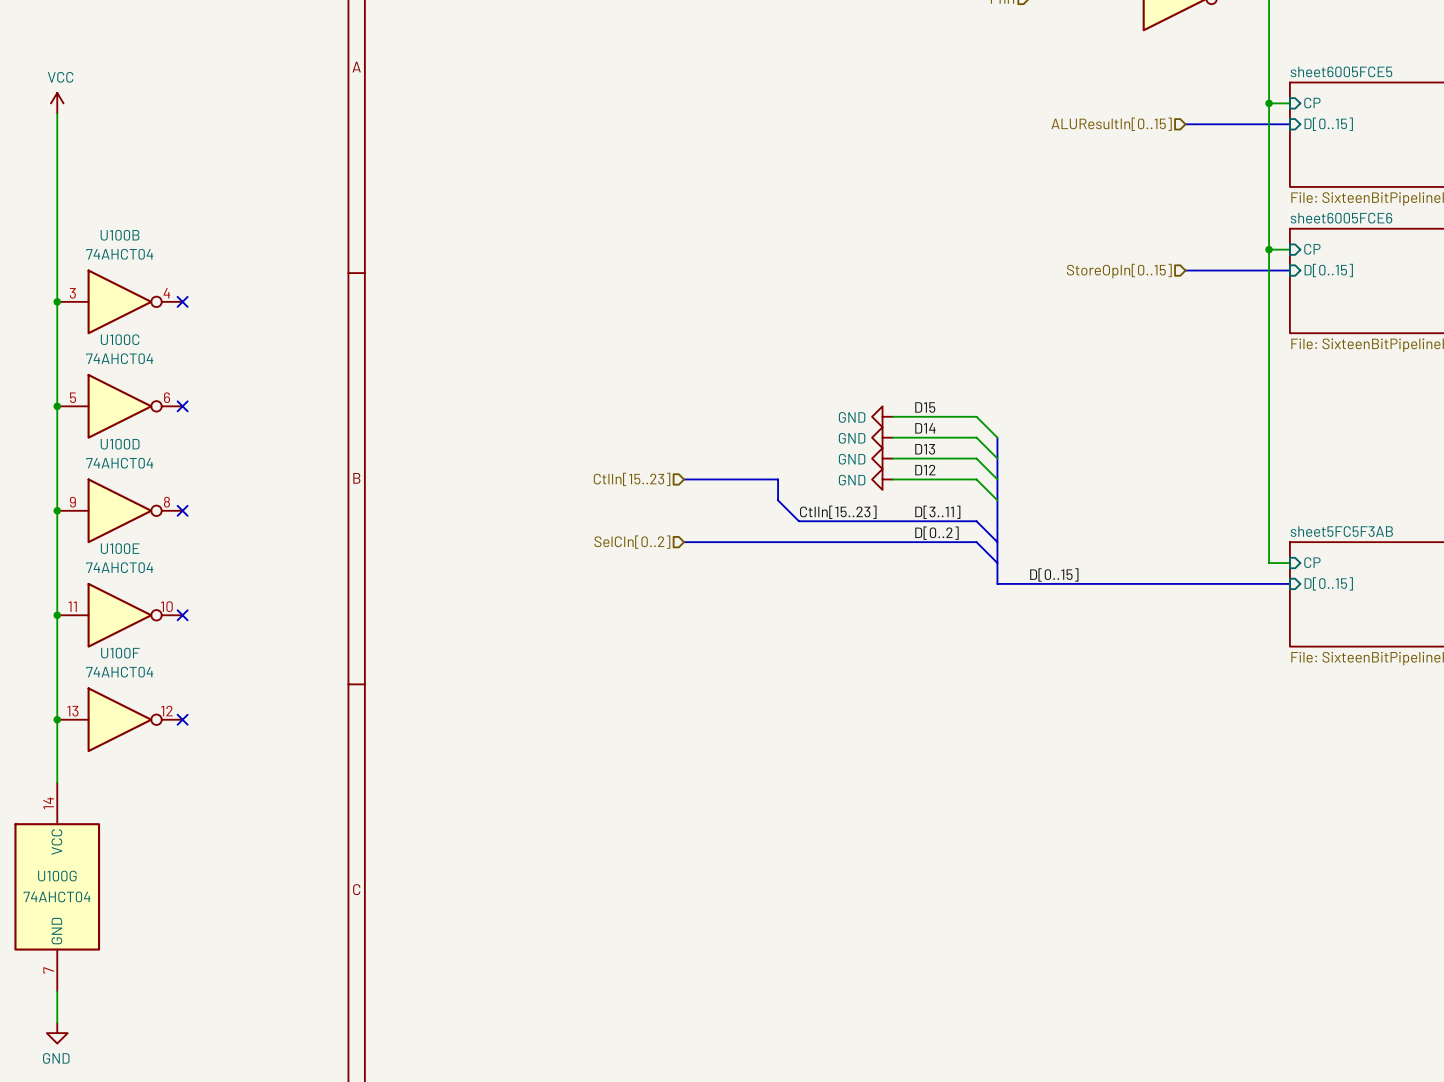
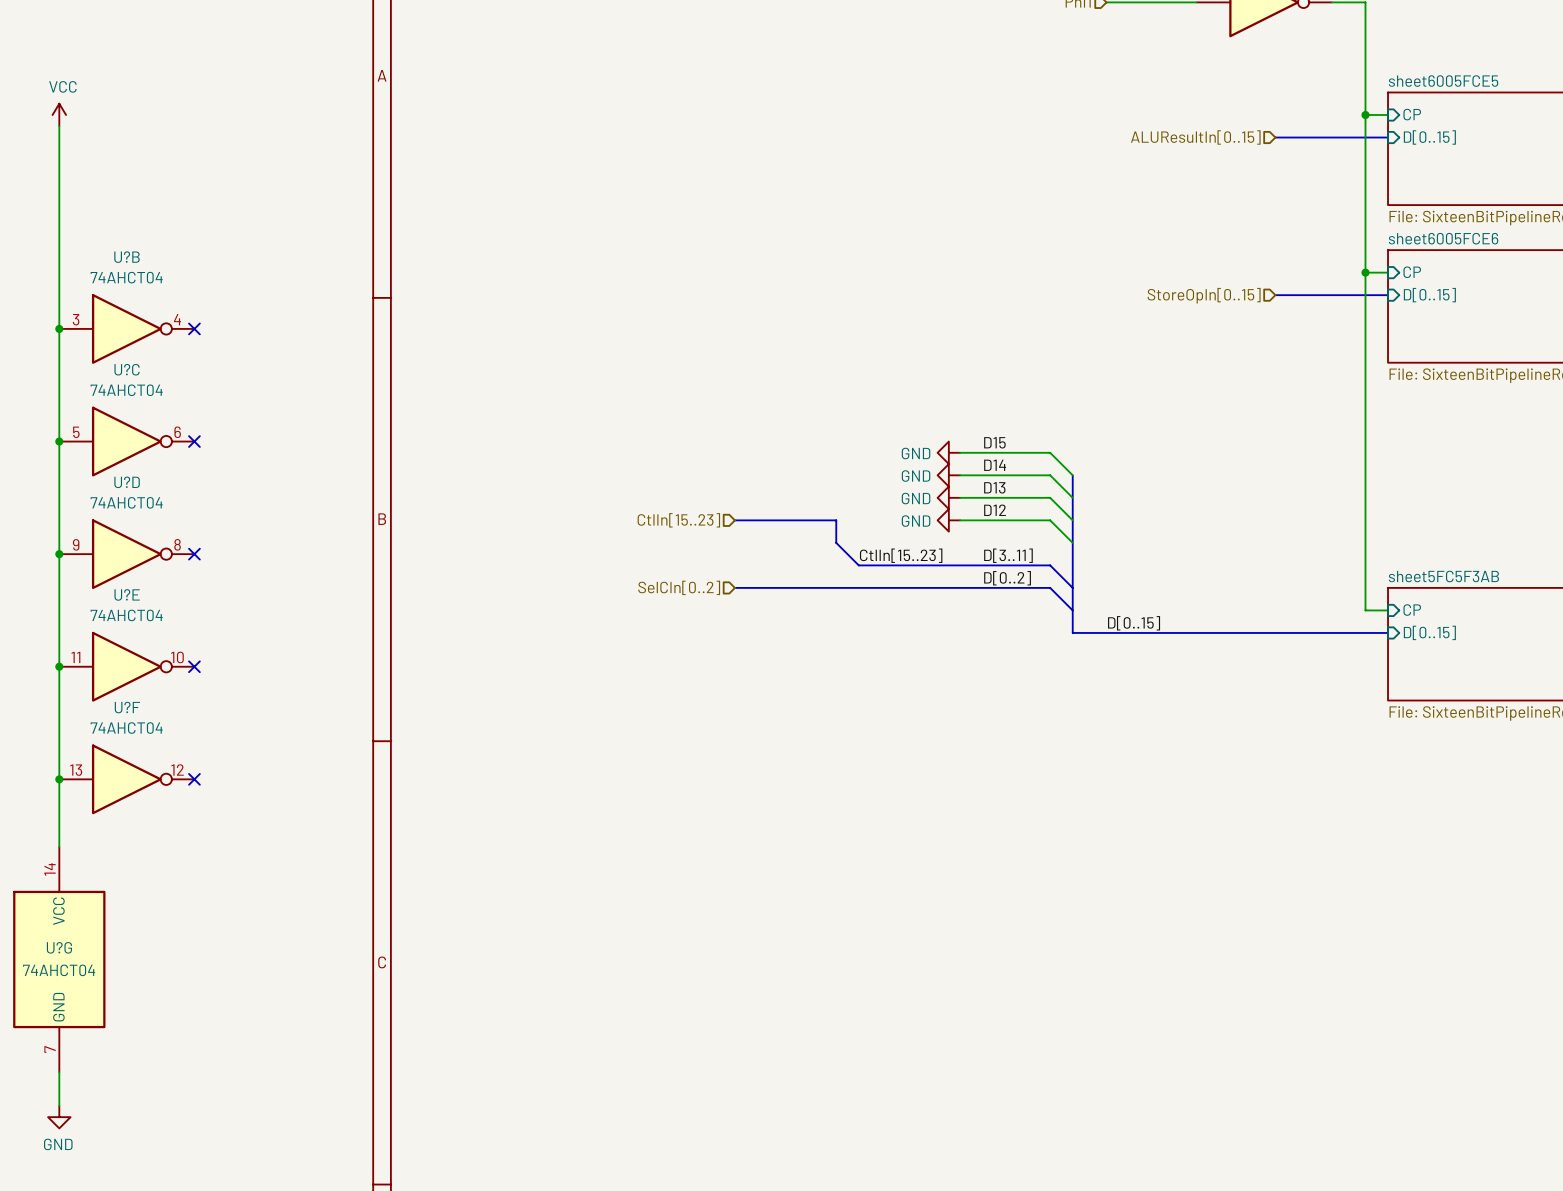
U100B name: U100B (120, 235) -> U?B (126, 257)
U100C name: U100C (120, 339) -> U?C (127, 369)
U100D name: U100D (120, 444) -> U?D (127, 482)
U100E name: U100E (120, 548) -> U?E (127, 594)
U100F name: U100F (120, 653) -> U?F (127, 707)
U100G name: U100G (57, 876) -> U?G (59, 947)

